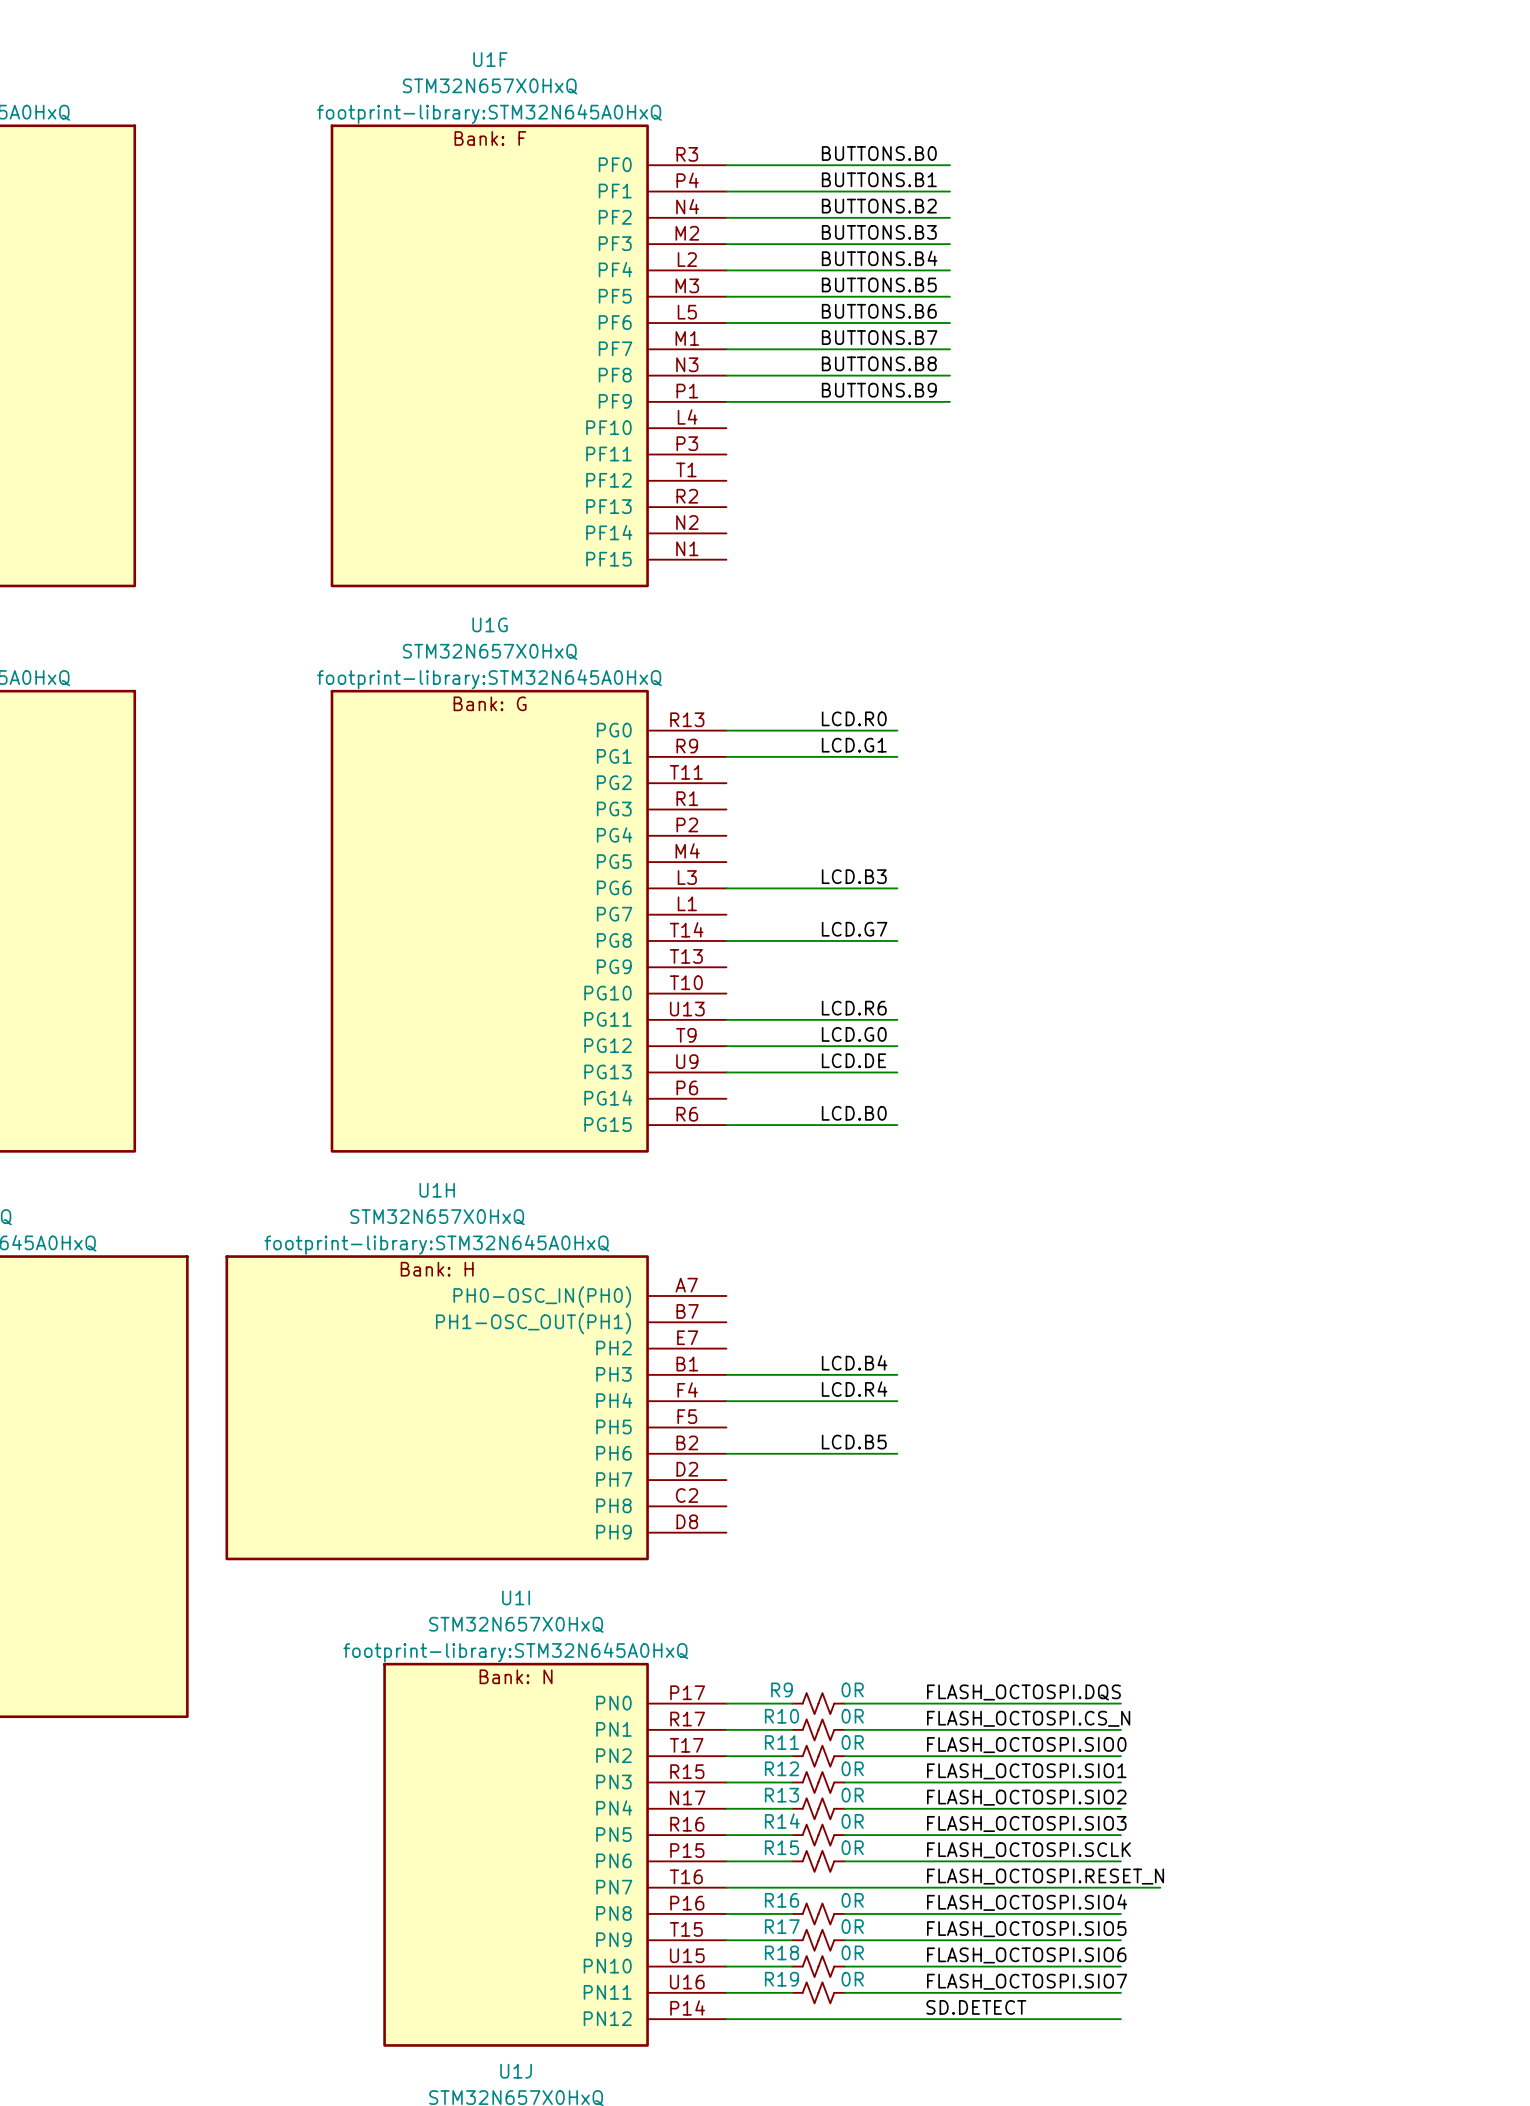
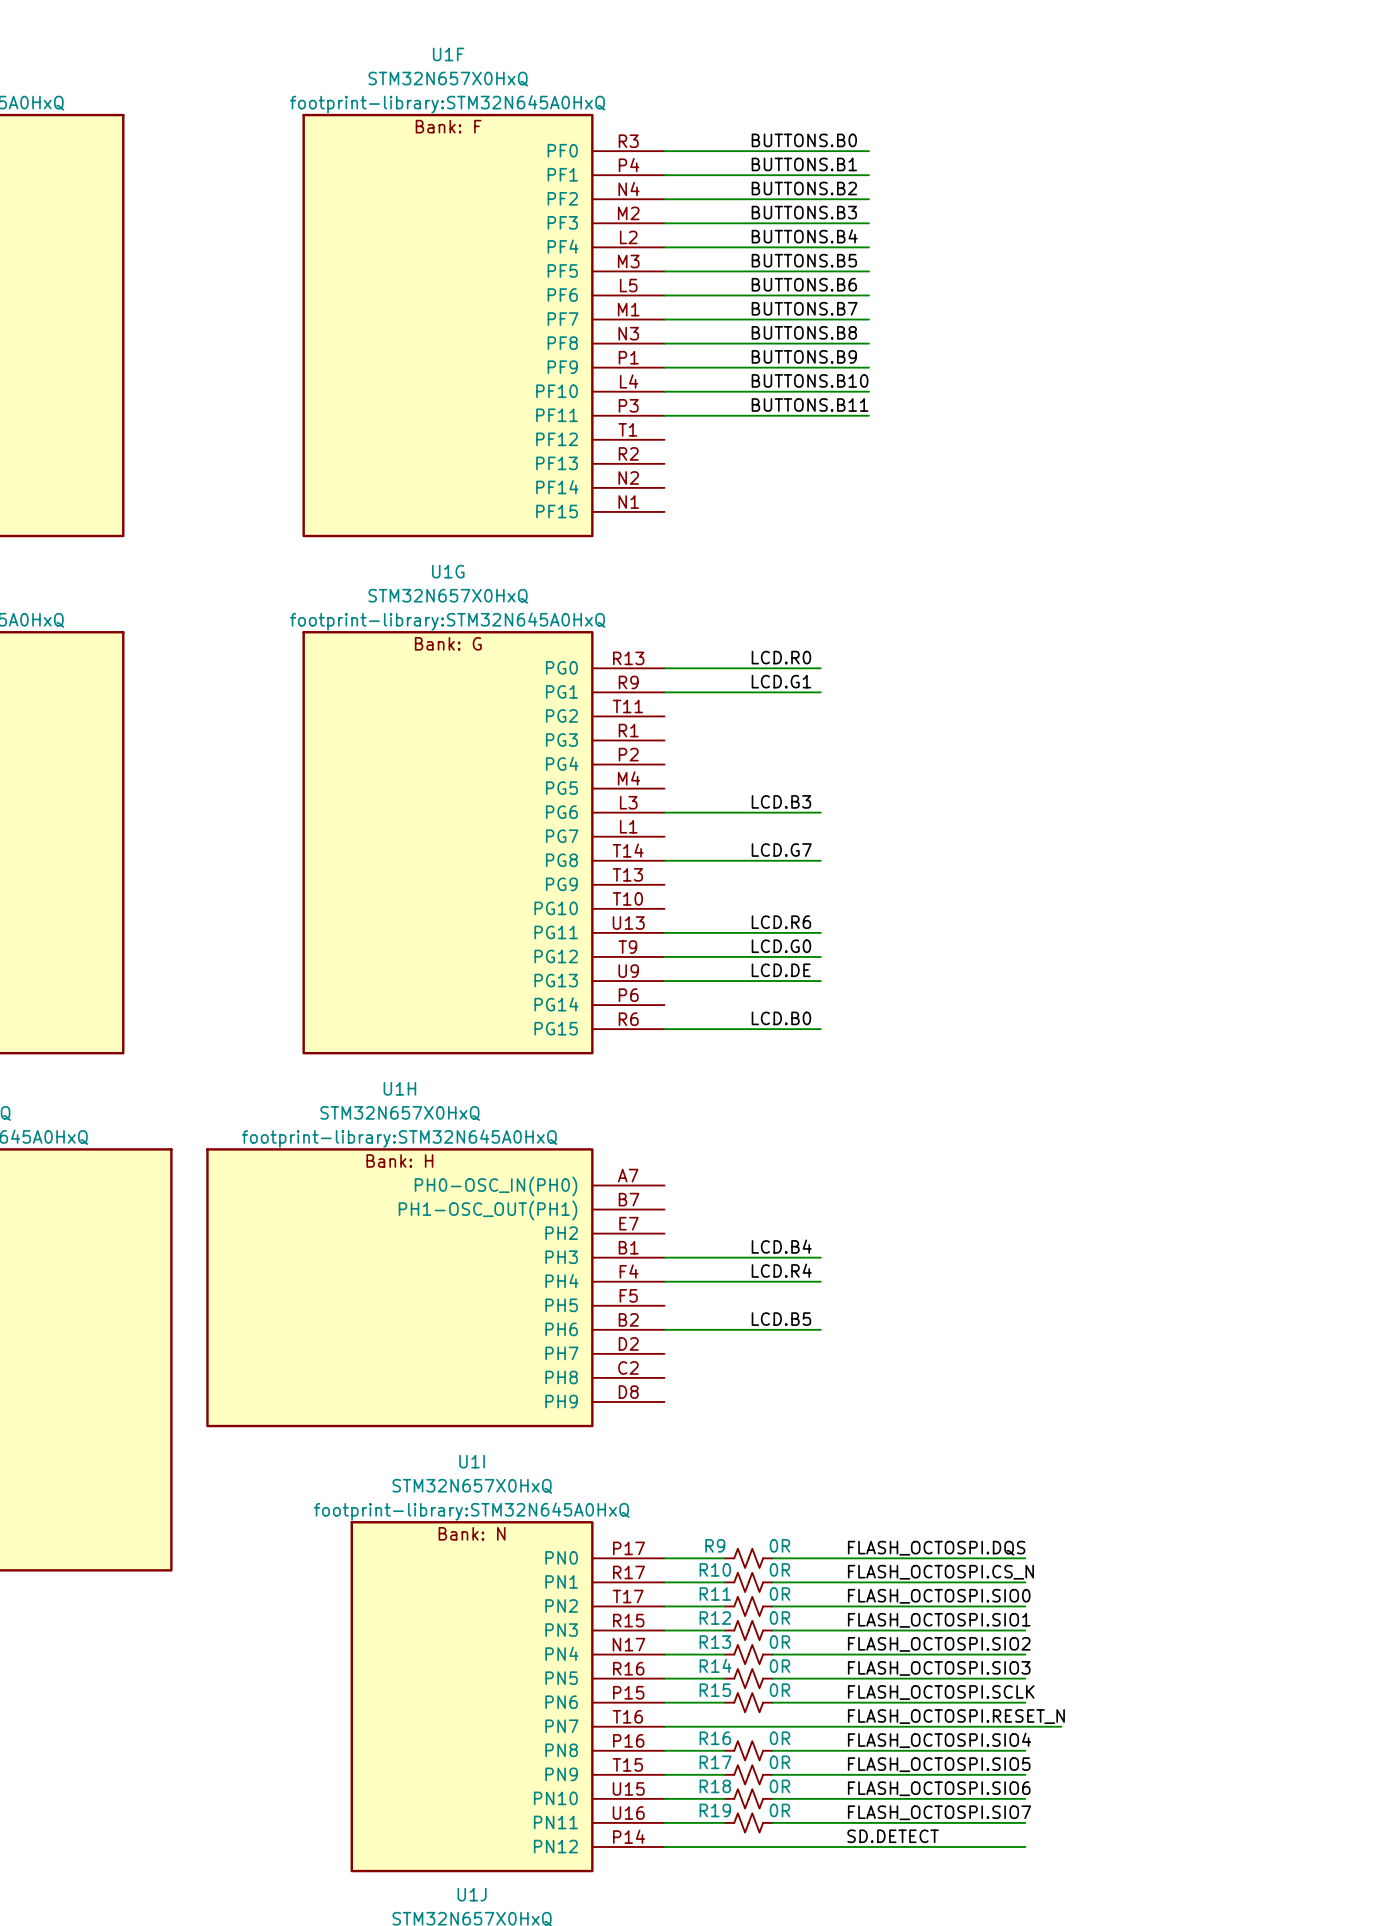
label: none -> BUTTONS.B10 (810, 380)
wire: none -> (664, 391) (868, 391)
label: none -> BUTTONS.B11 (810, 405)
wire: none -> (664, 415) (868, 415)

